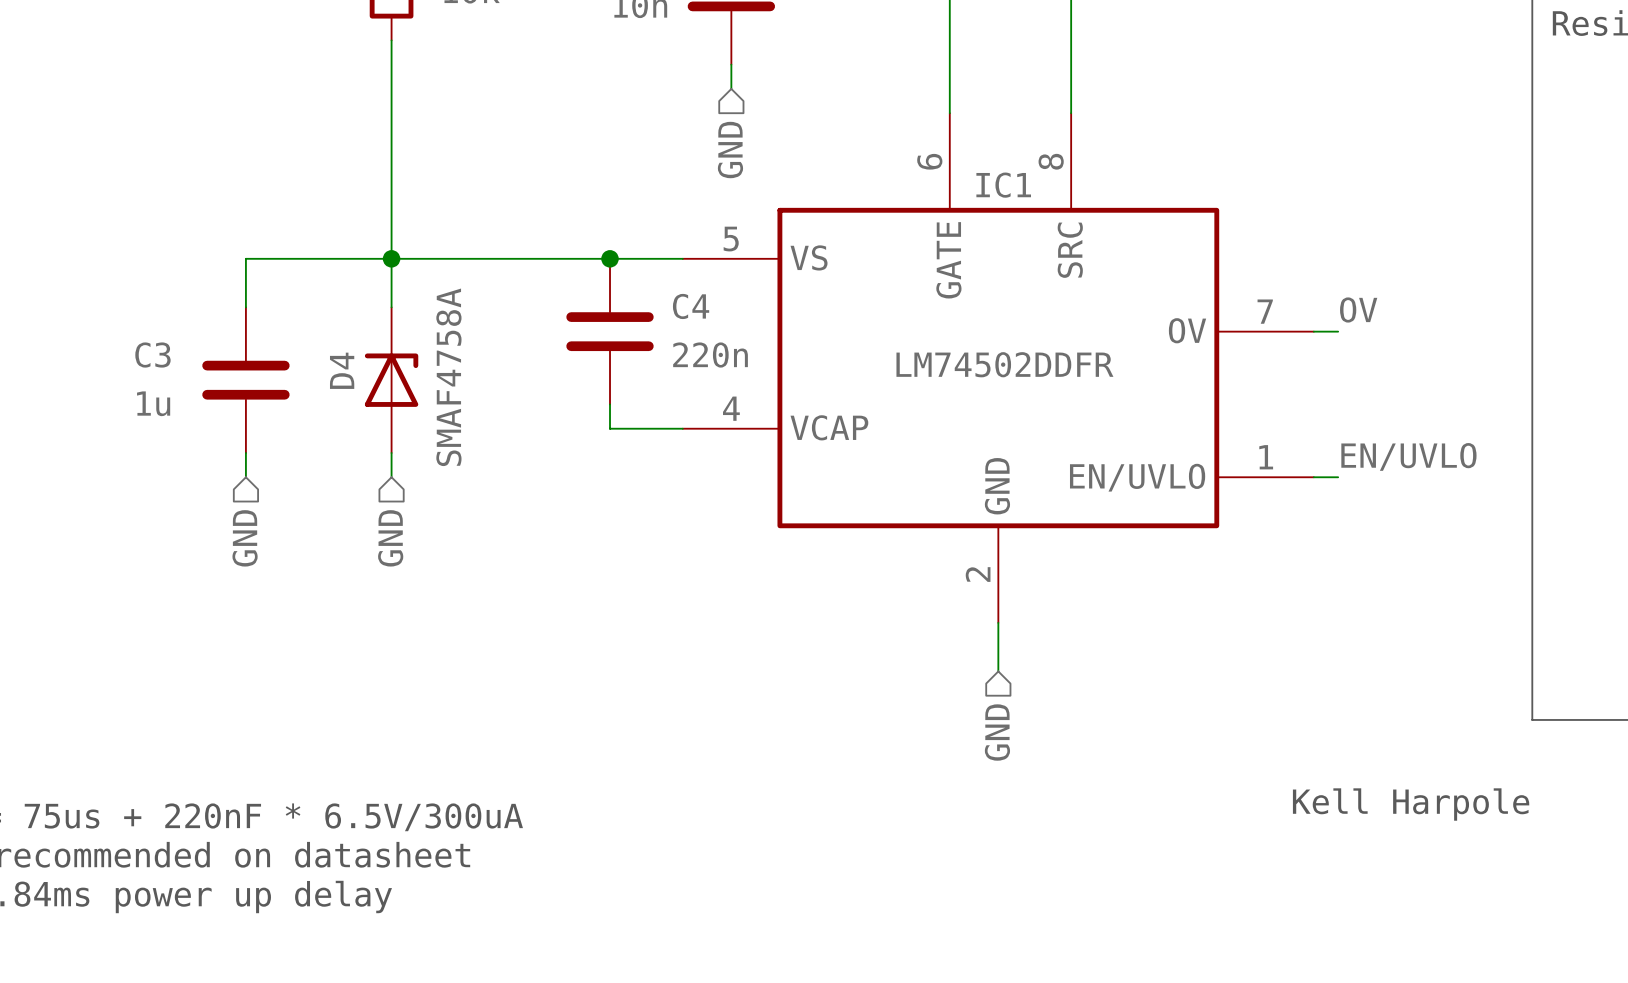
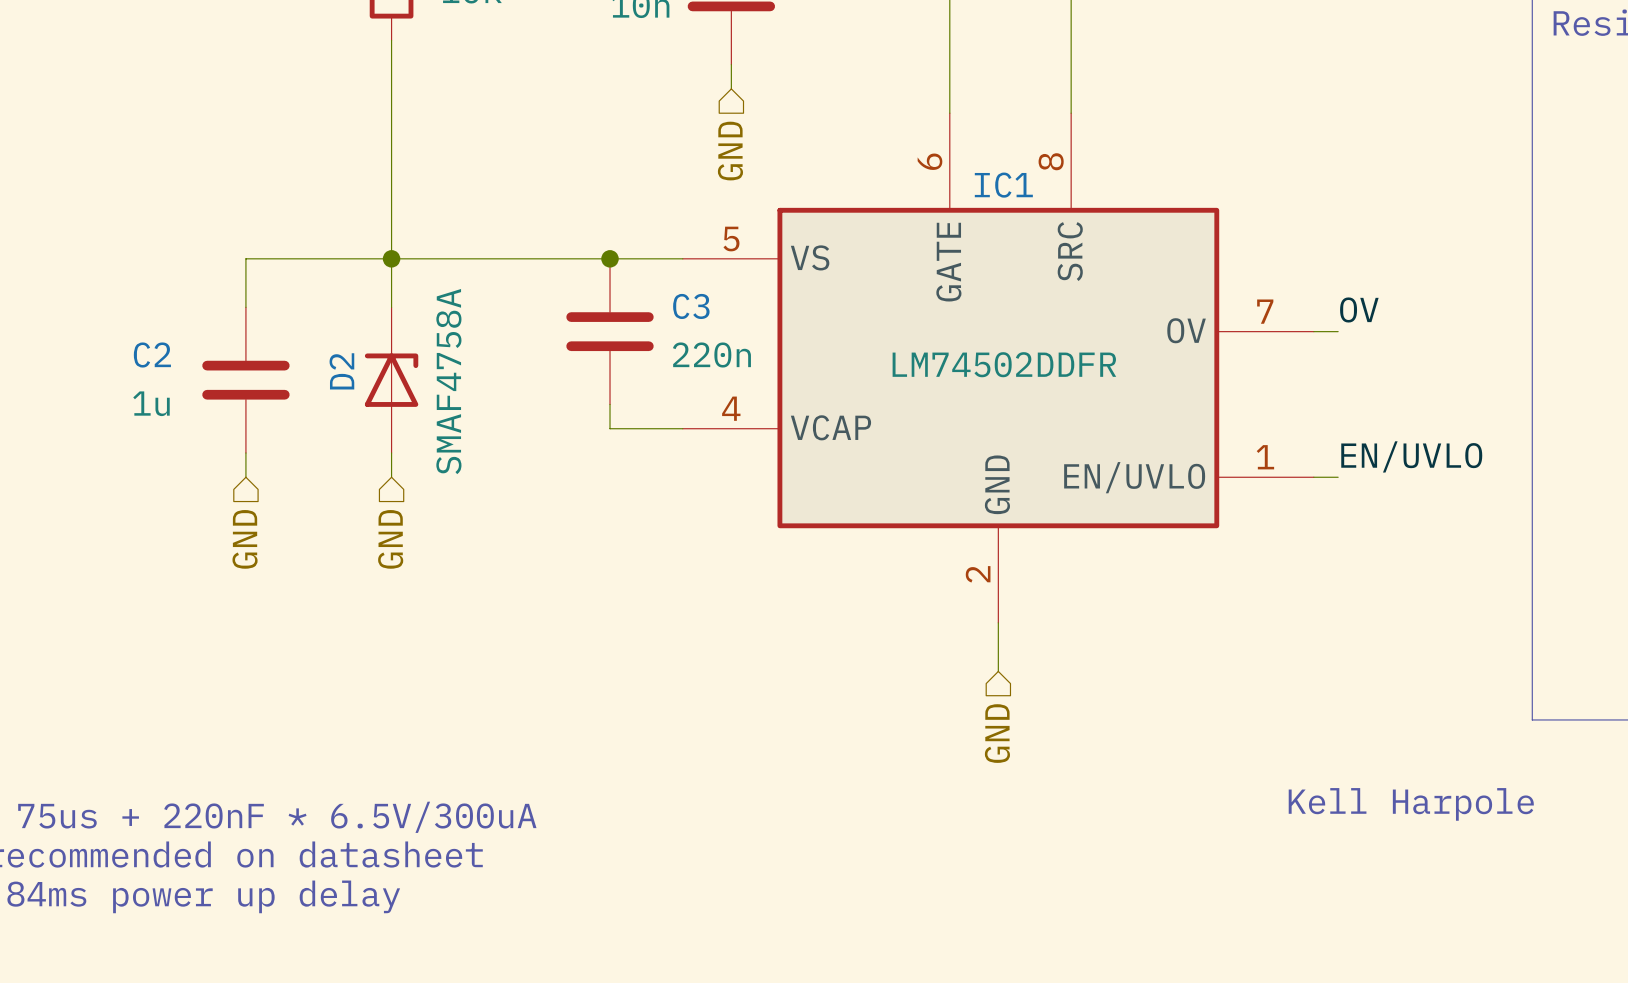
C4 name: C4 (691, 306) -> C3 (691, 306)
C3 name: C3 (152, 355) -> C2 (152, 355)
D4 name: D4 (342, 370) -> D2 (341, 371)

